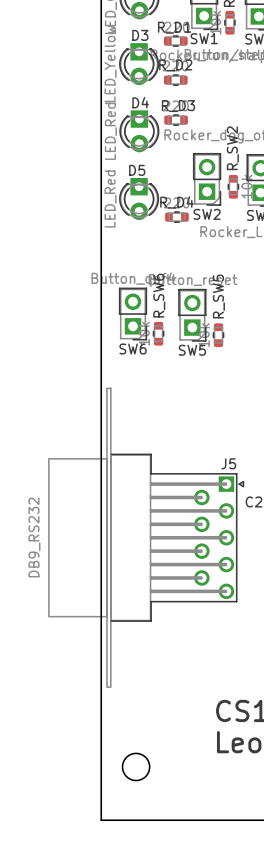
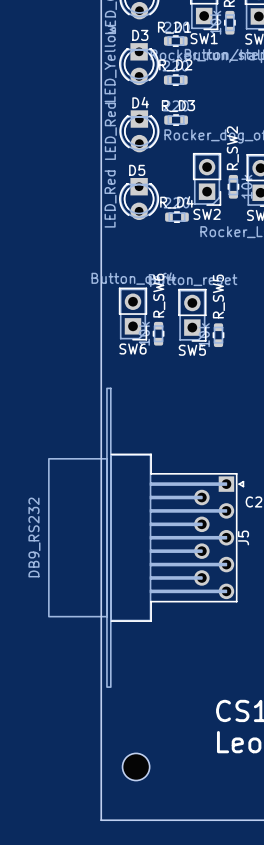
J5 name rotation: 0° (228, 463) -> 90° counterclockwise (243, 537)
J5 name position: J5 (228, 463) -> J5 (243, 537)

